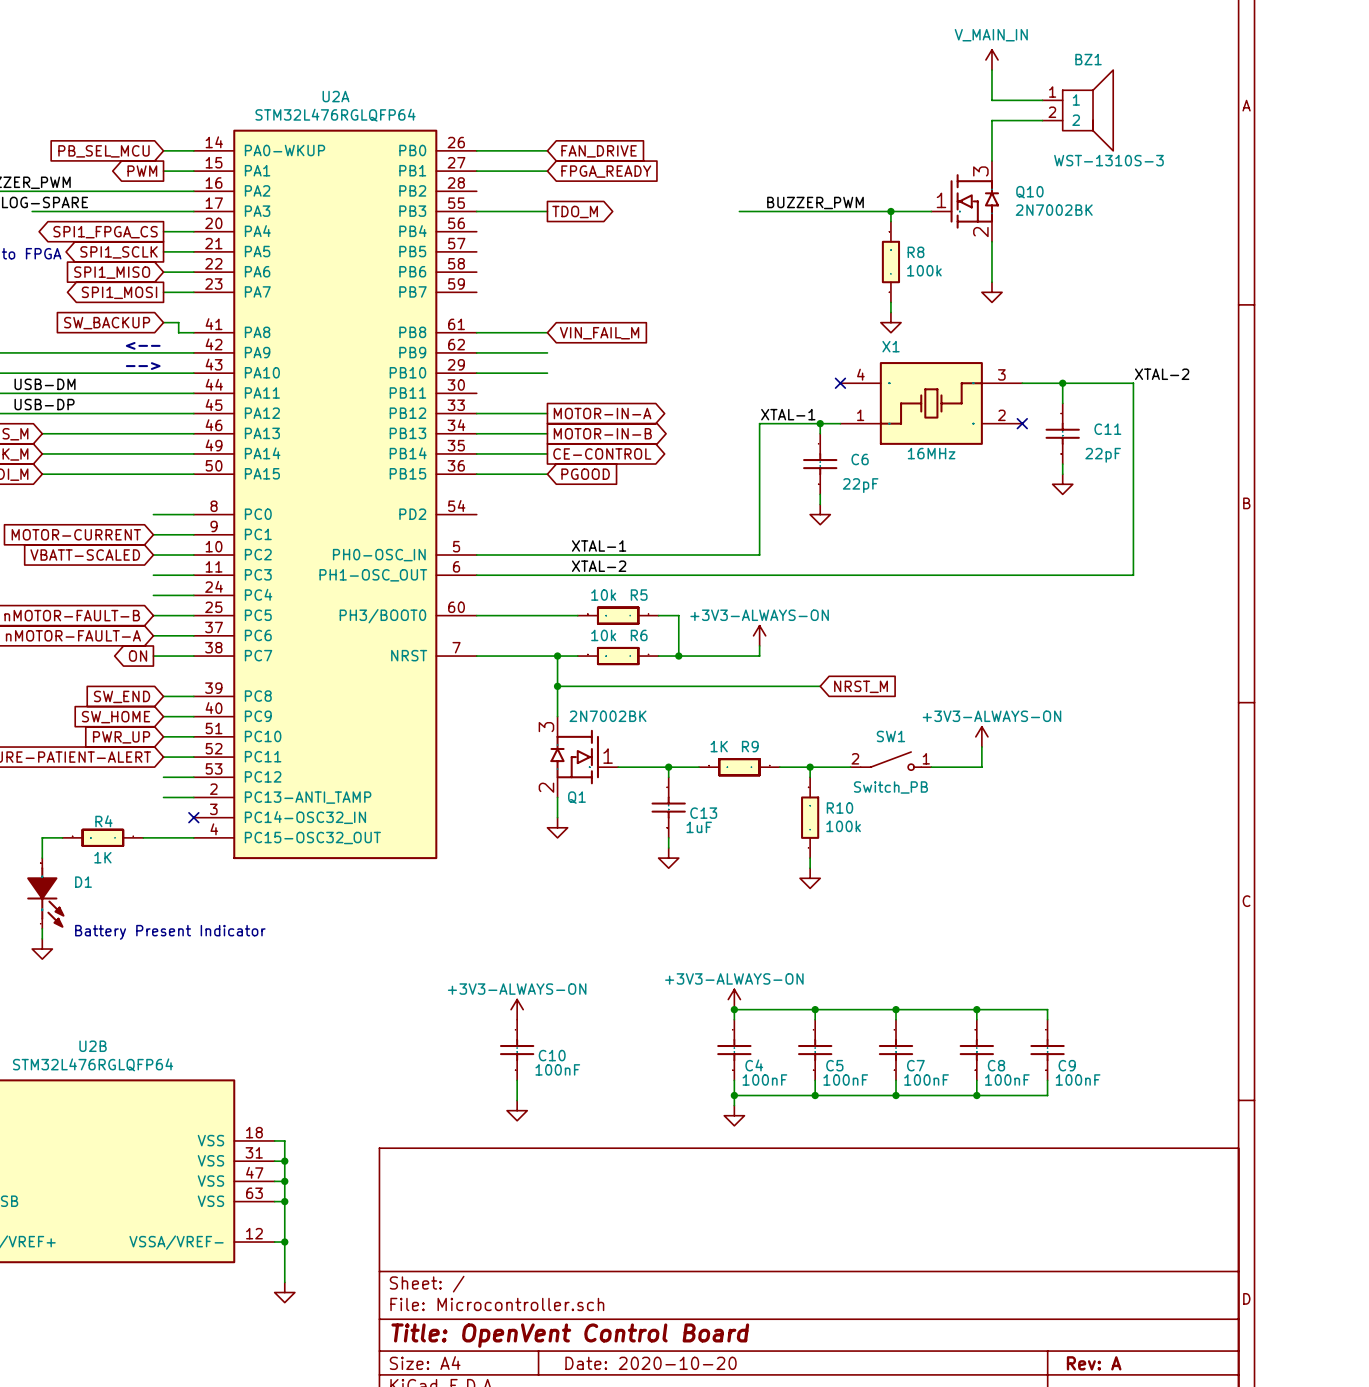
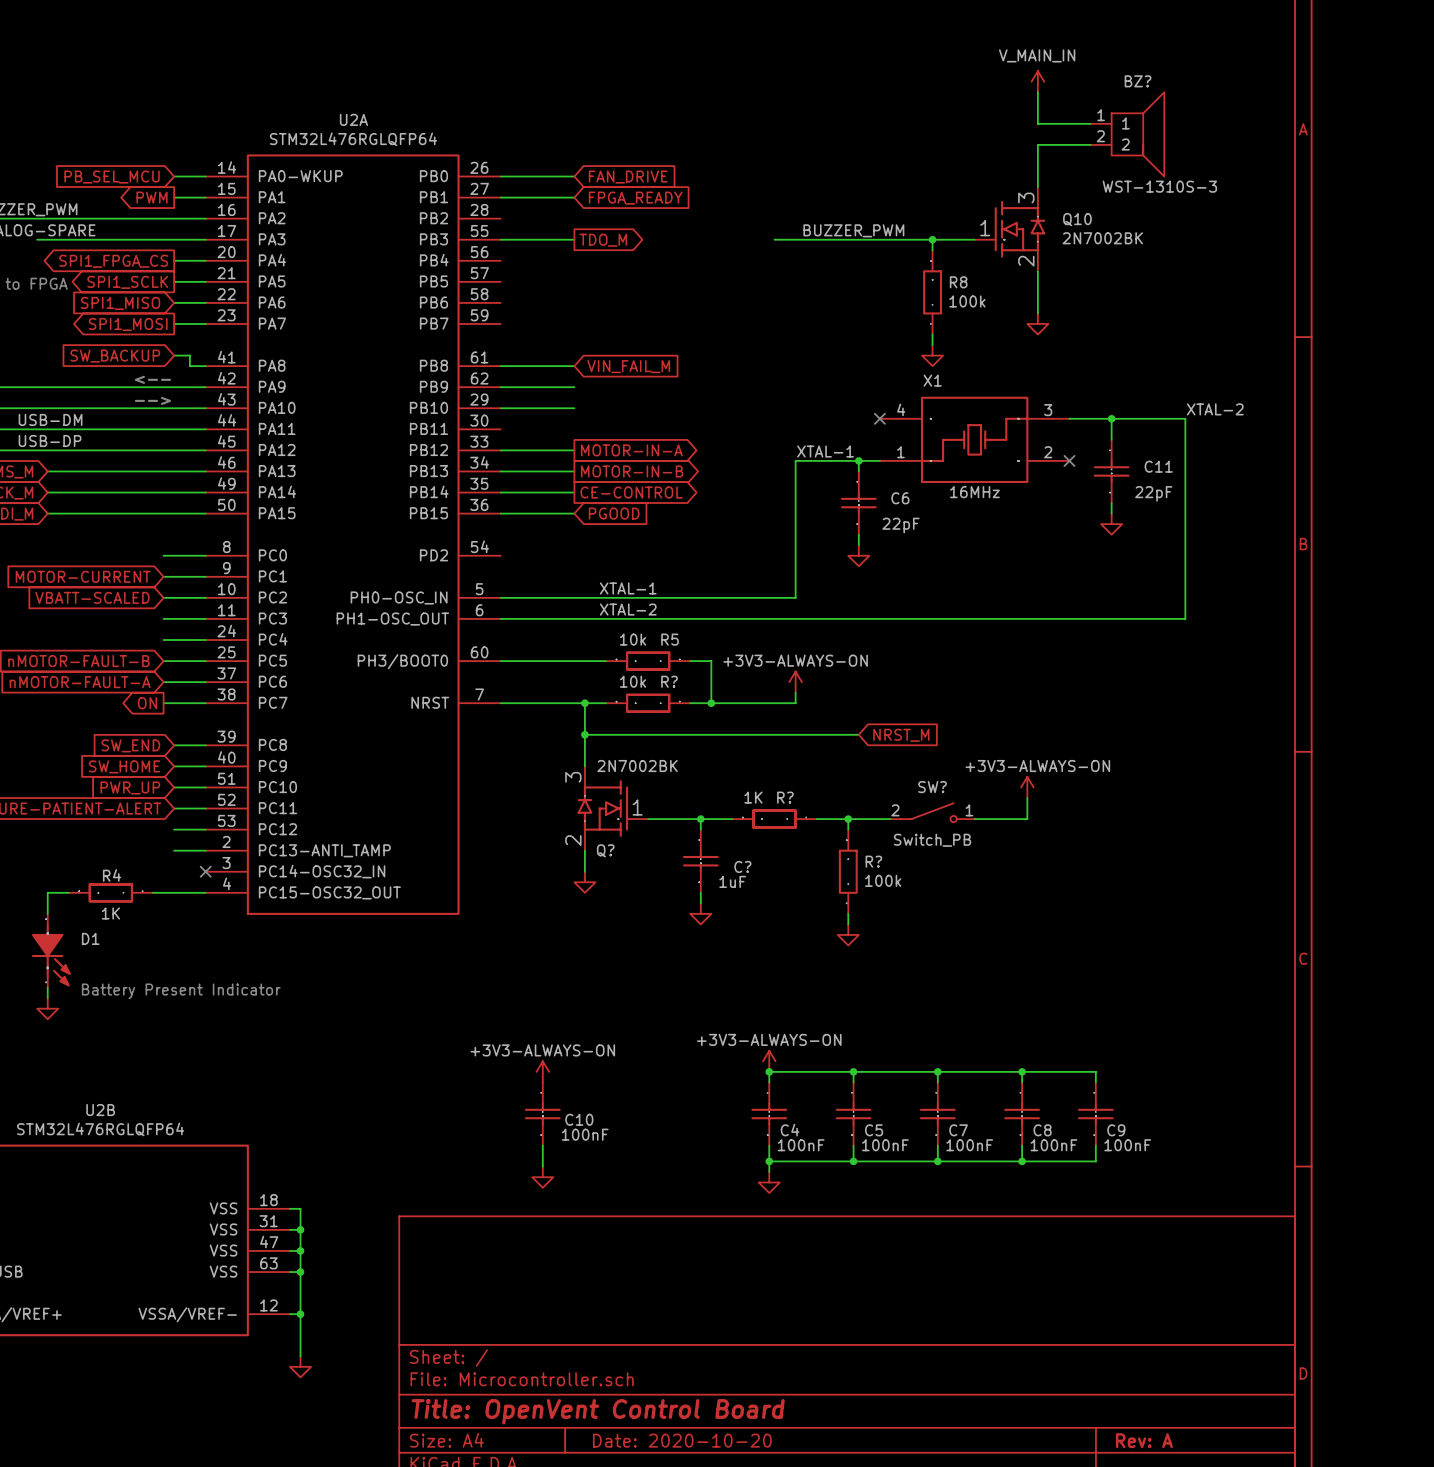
BZ1 name: BZ1 (1088, 59) -> BZ? (1138, 81)
R6 name: R6 (639, 635) -> R? (669, 681)
SW1 name: SW1 (890, 736) -> SW? (932, 787)
R9 name: R9 (750, 746) -> R? (785, 797)
Q1 name: Q1 (576, 797) -> Q? (605, 850)
R10 name: R10 (839, 808) -> R? (873, 861)
C13 name: C13 (703, 813) -> C? (742, 866)

